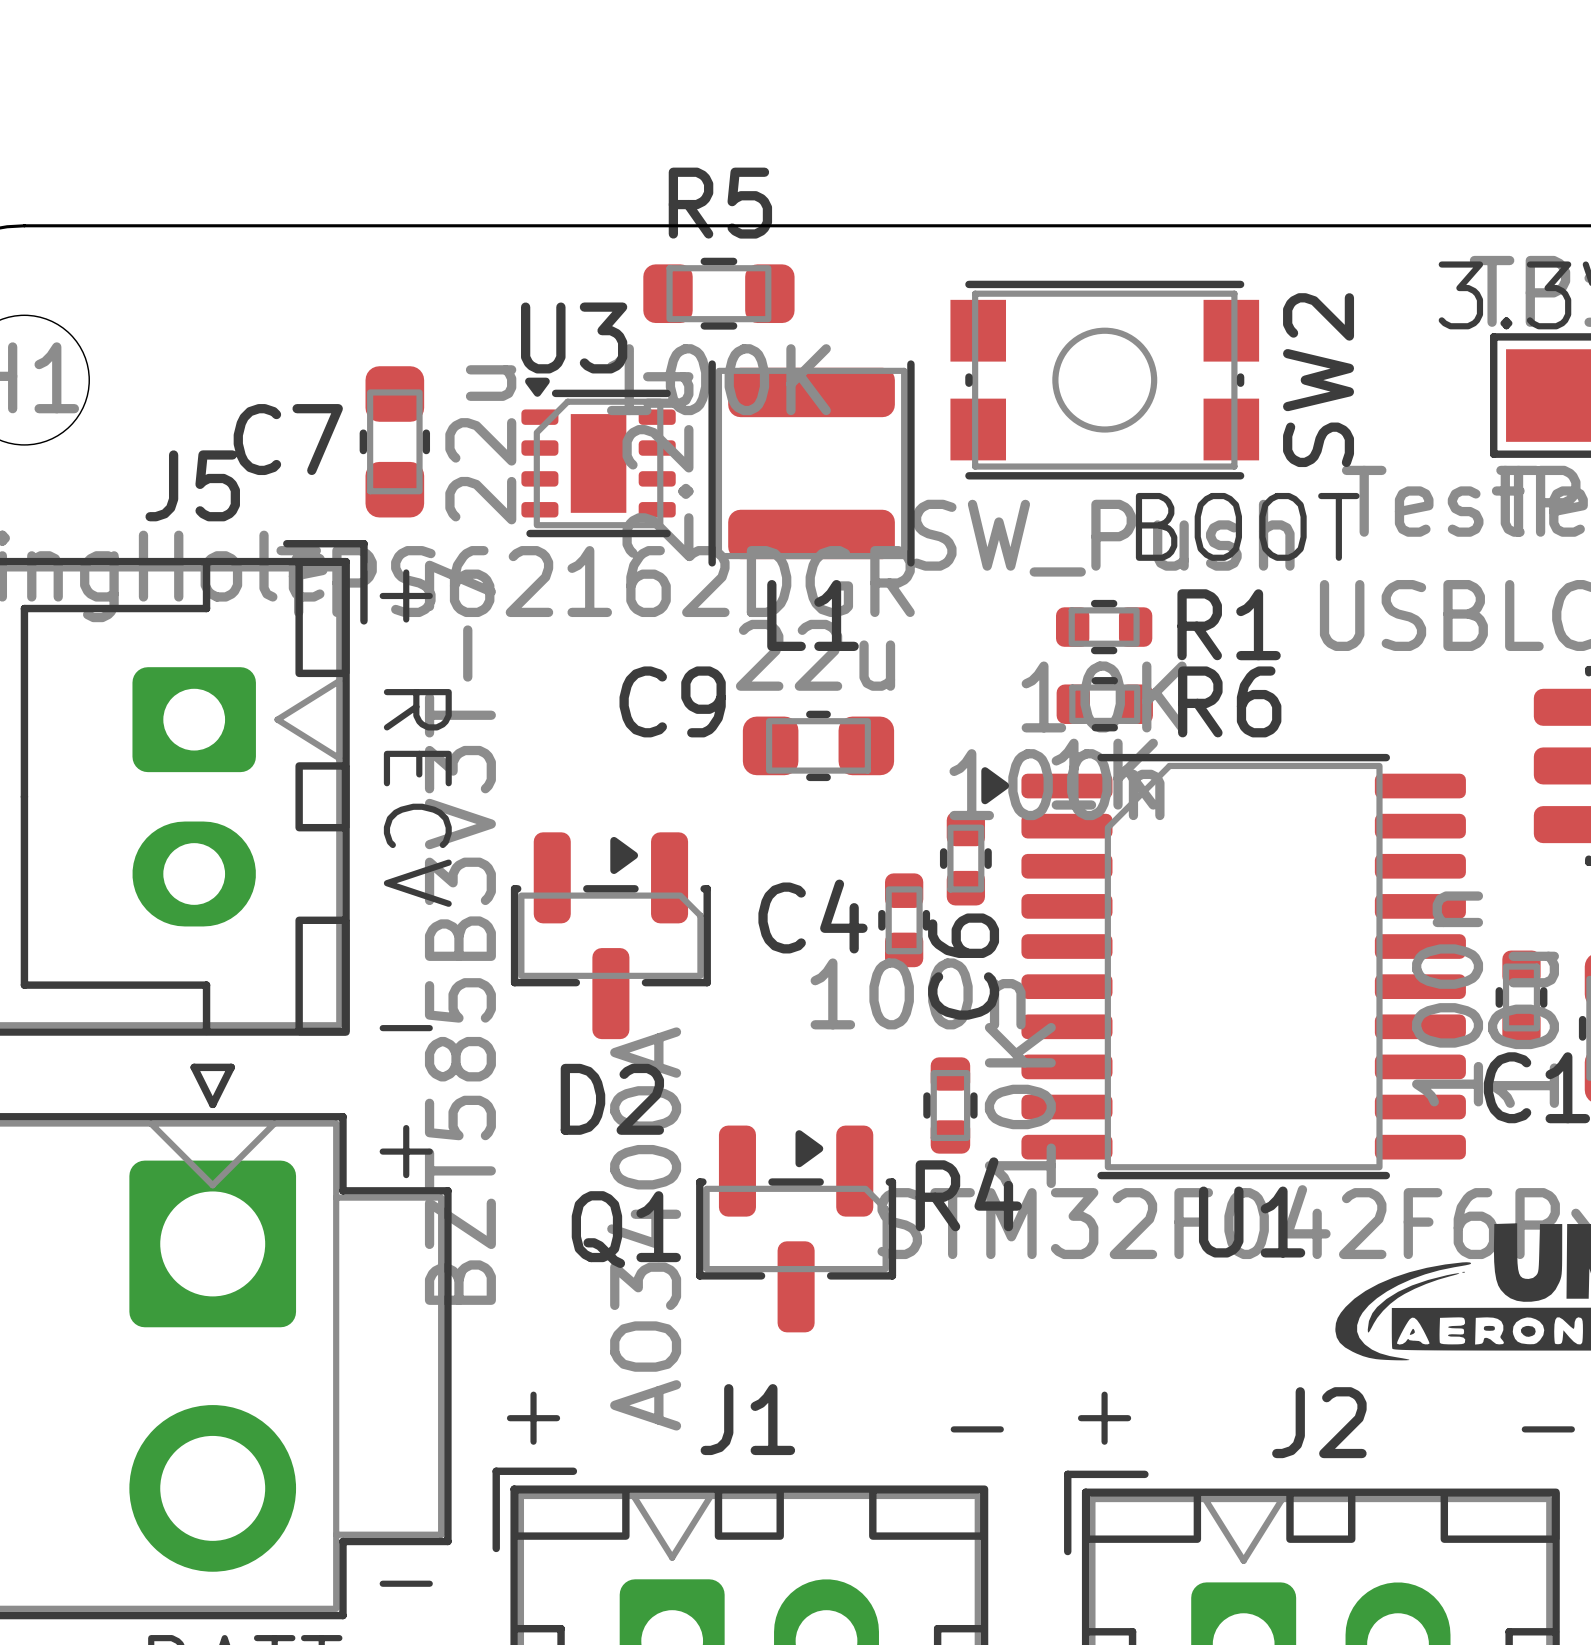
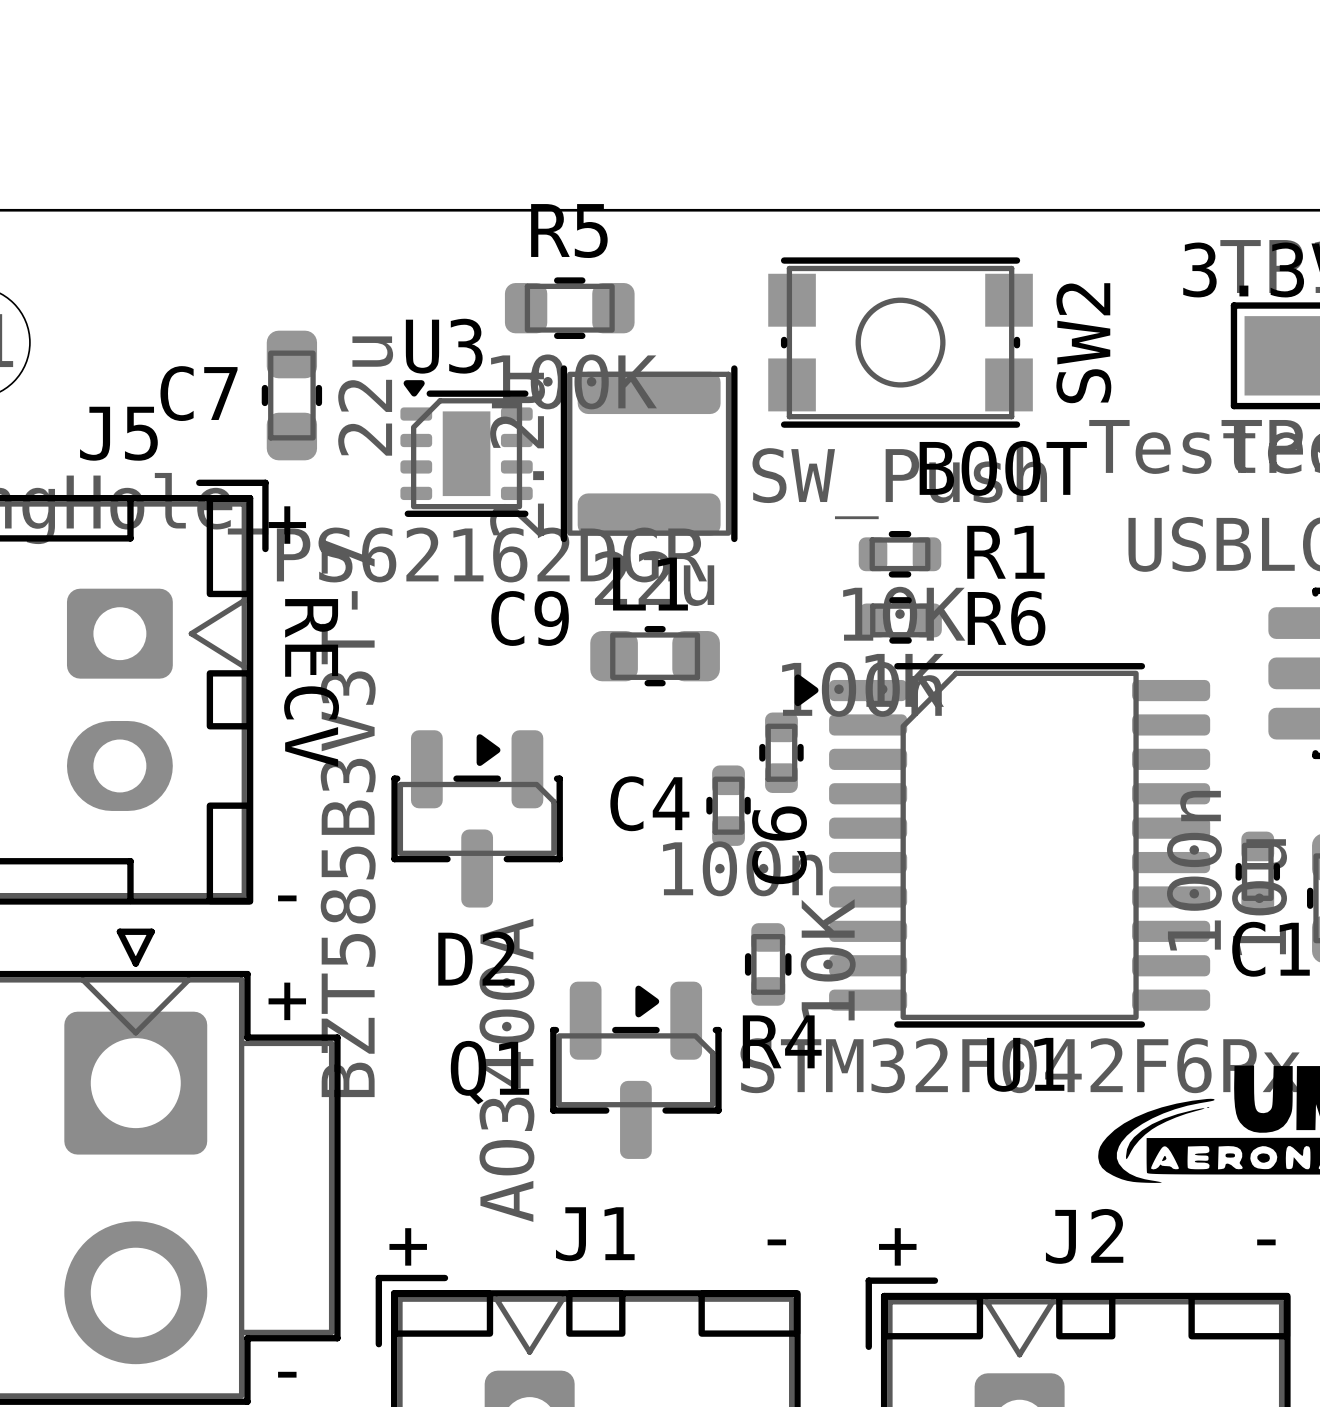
R5 position: (718, 293) -> (569, 308)
U3 position: (598, 457) -> (466, 448)
L1 position: (811, 463) -> (649, 453)

